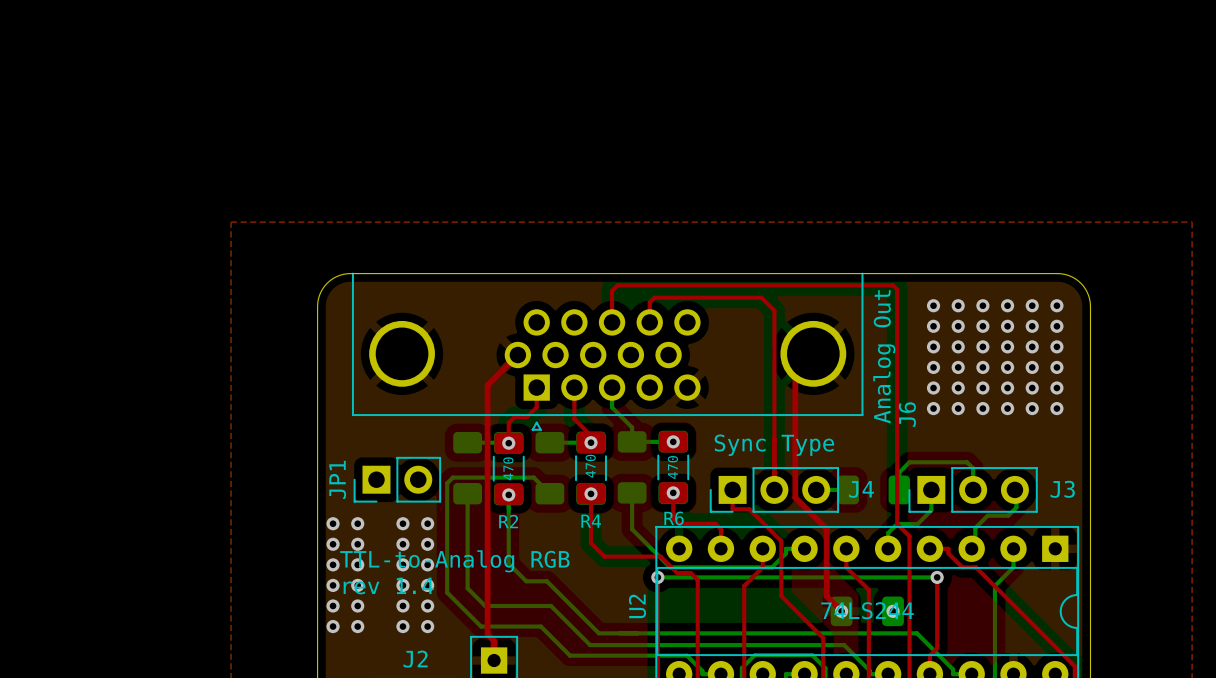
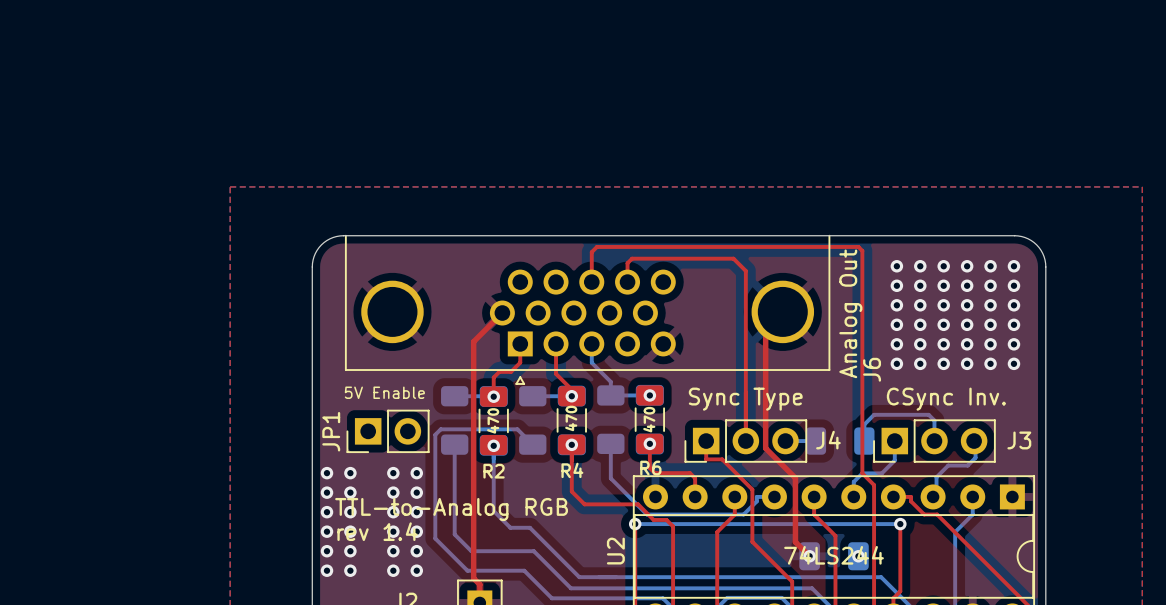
text: none -> 5V Enable (384, 392)
J3 value: none -> CSync Inv. (946, 399)

